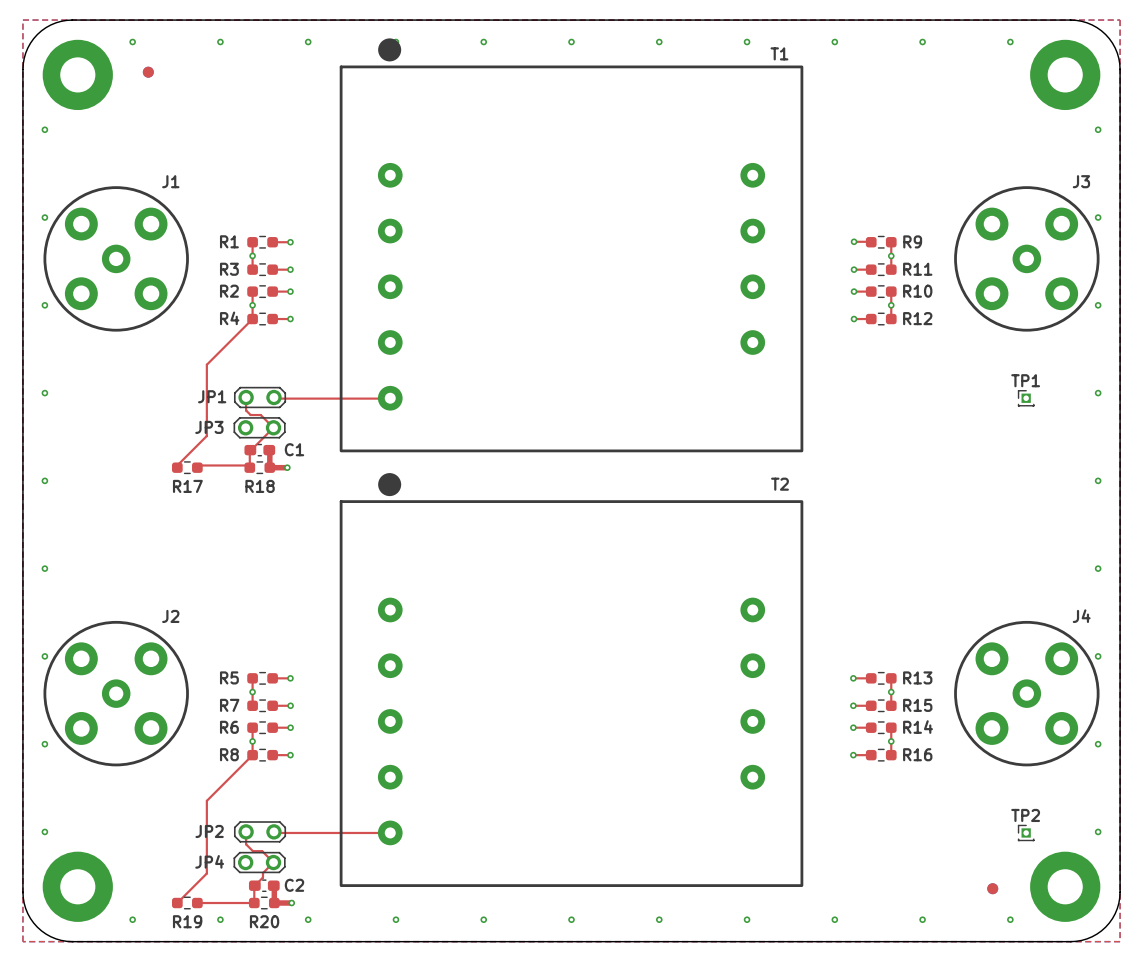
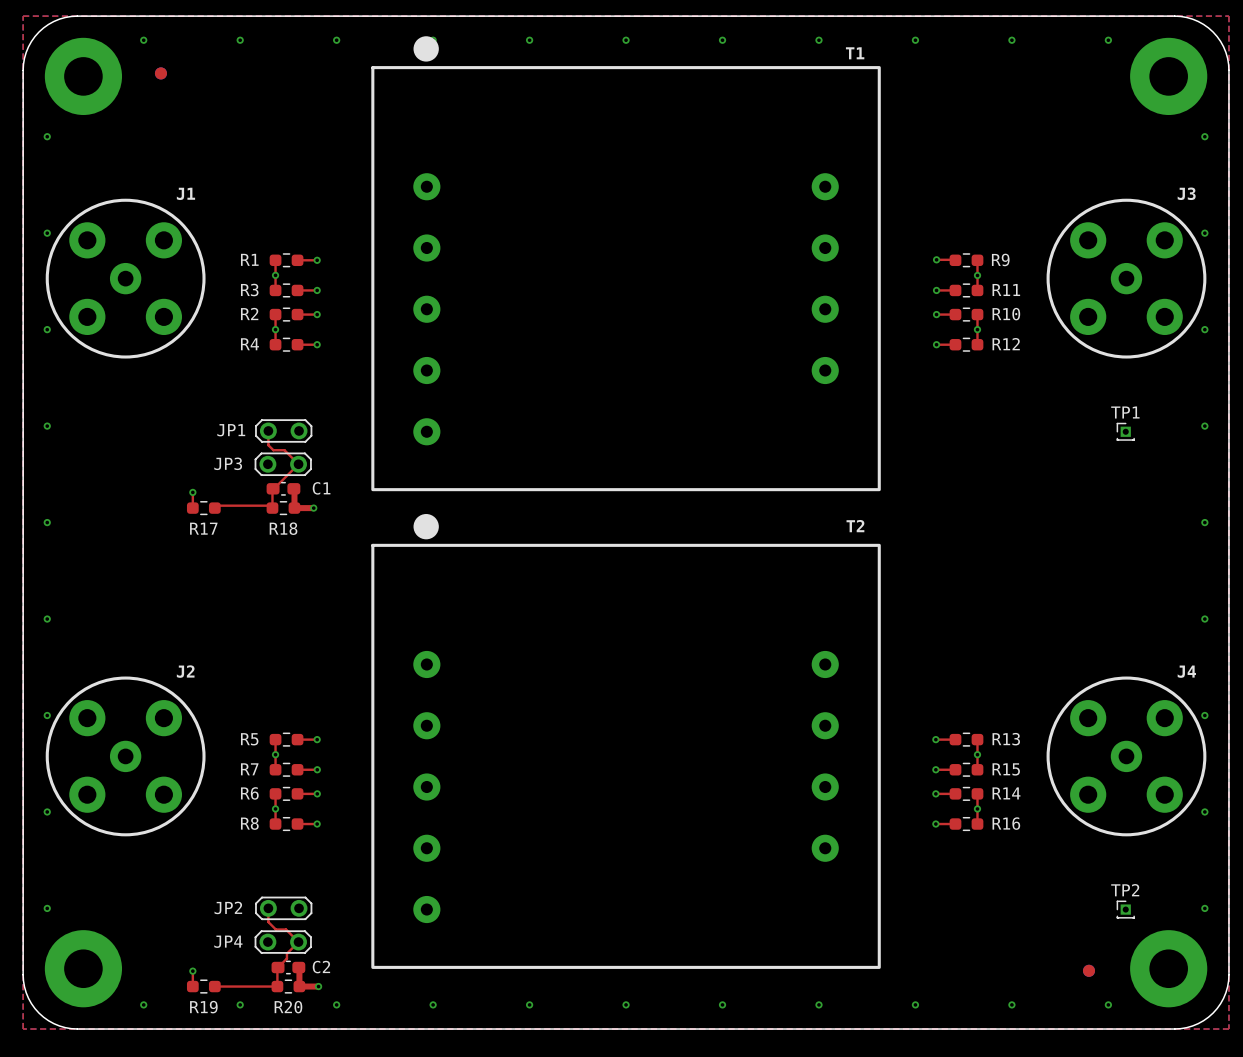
top track: (252, 319) (206, 364) (206, 435) (177, 465) -> none
top track: (273, 398) (390, 398) -> none
top track: none -> (192, 492) (192, 508)
via: none -> (192, 492)
top track: (252, 755) (206, 800) (206, 873) (177, 903) -> (192, 971) (192, 986)
top track: (276, 832) (390, 832) -> none
via: none -> (192, 971)

